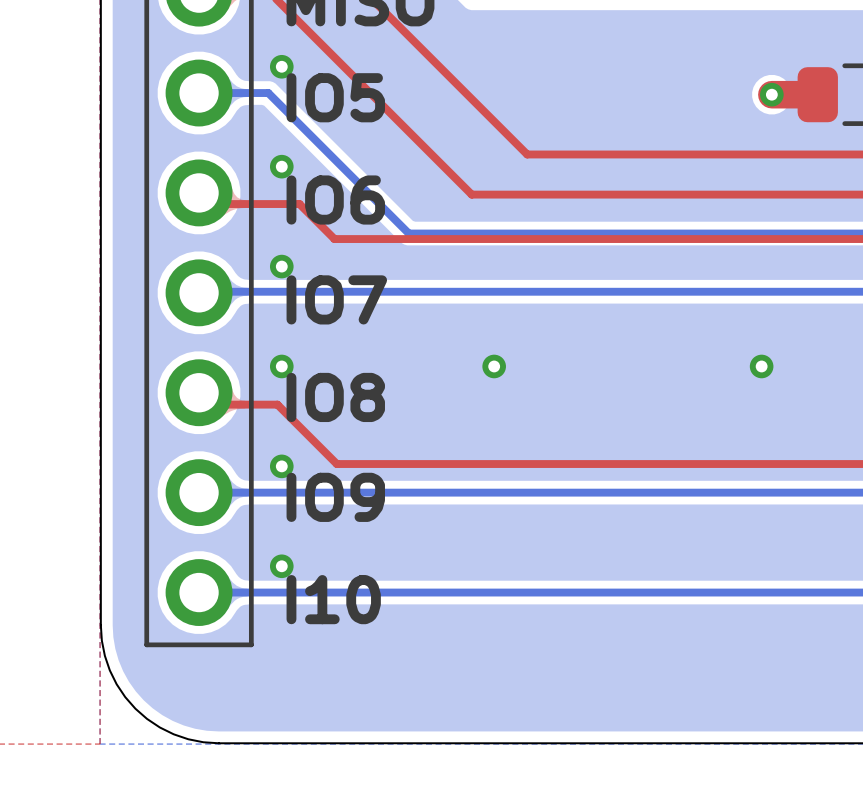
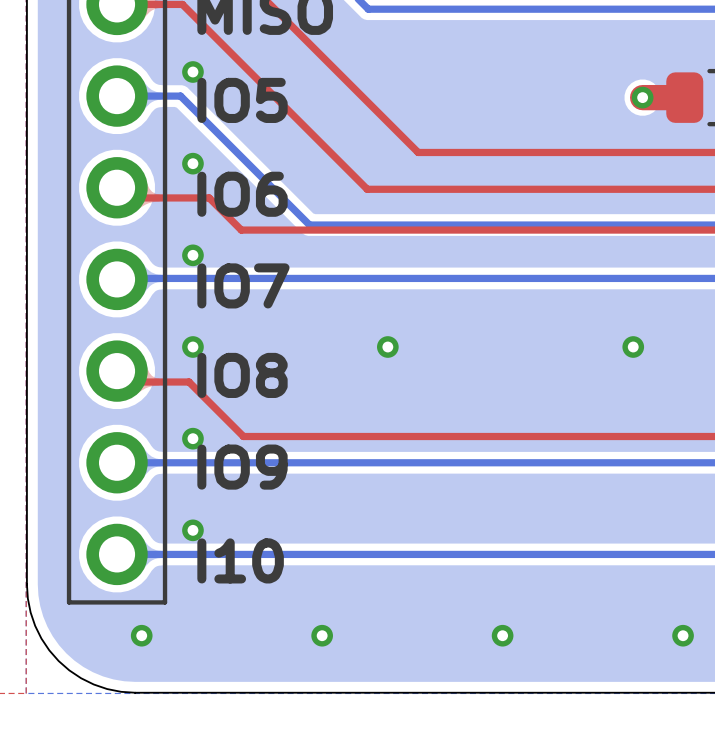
via: none -> (141, 635)
via: none -> (322, 635)
via: none -> (502, 635)
via: none -> (683, 635)

